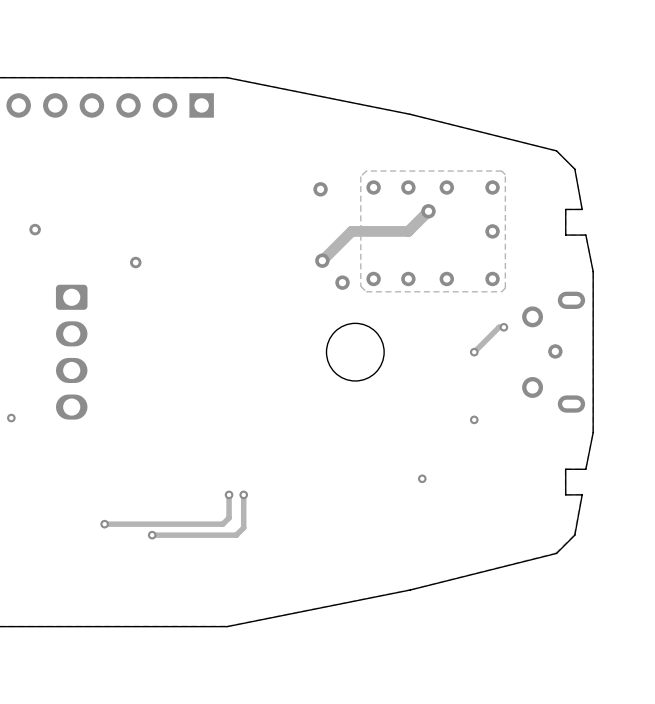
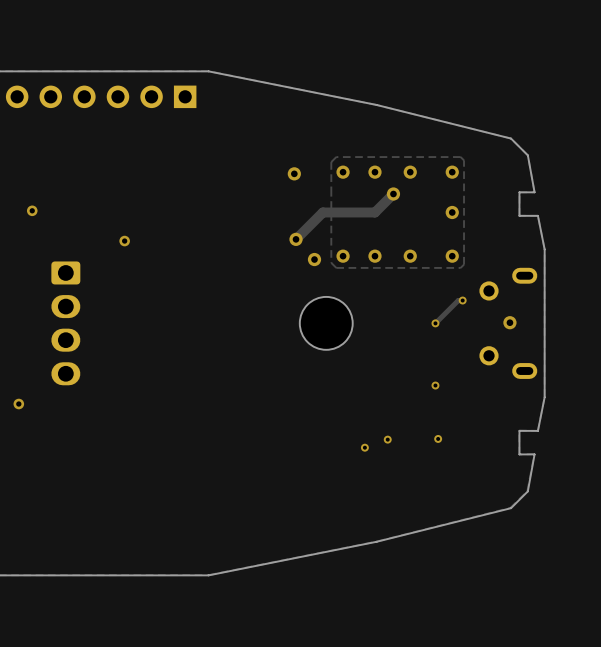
via: (11, 418) -> none
via: none -> (18, 404)
via: none -> (438, 438)
via: none -> (364, 447)
track: (229, 494) (229, 517) (222, 524) (104, 524) -> none
via: (229, 494) -> none
track: (243, 494) (243, 527) (236, 535) (152, 535) -> none
via: (243, 494) -> none
via: (104, 524) -> none
via: (152, 535) -> none

